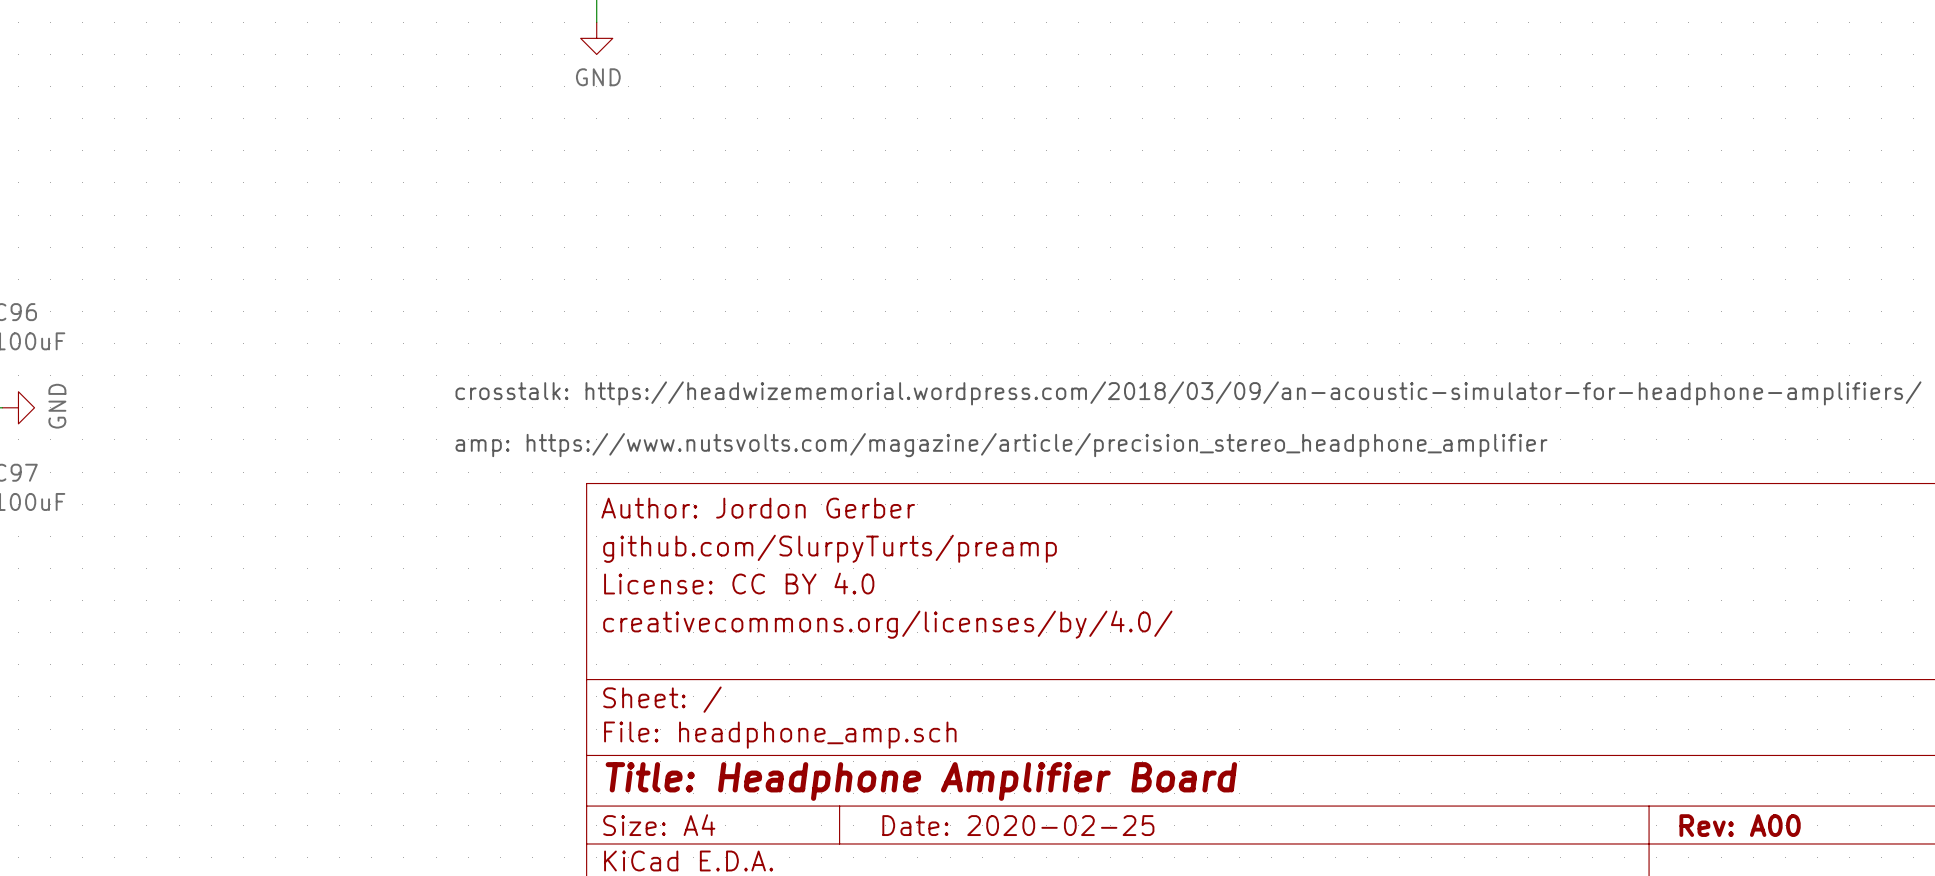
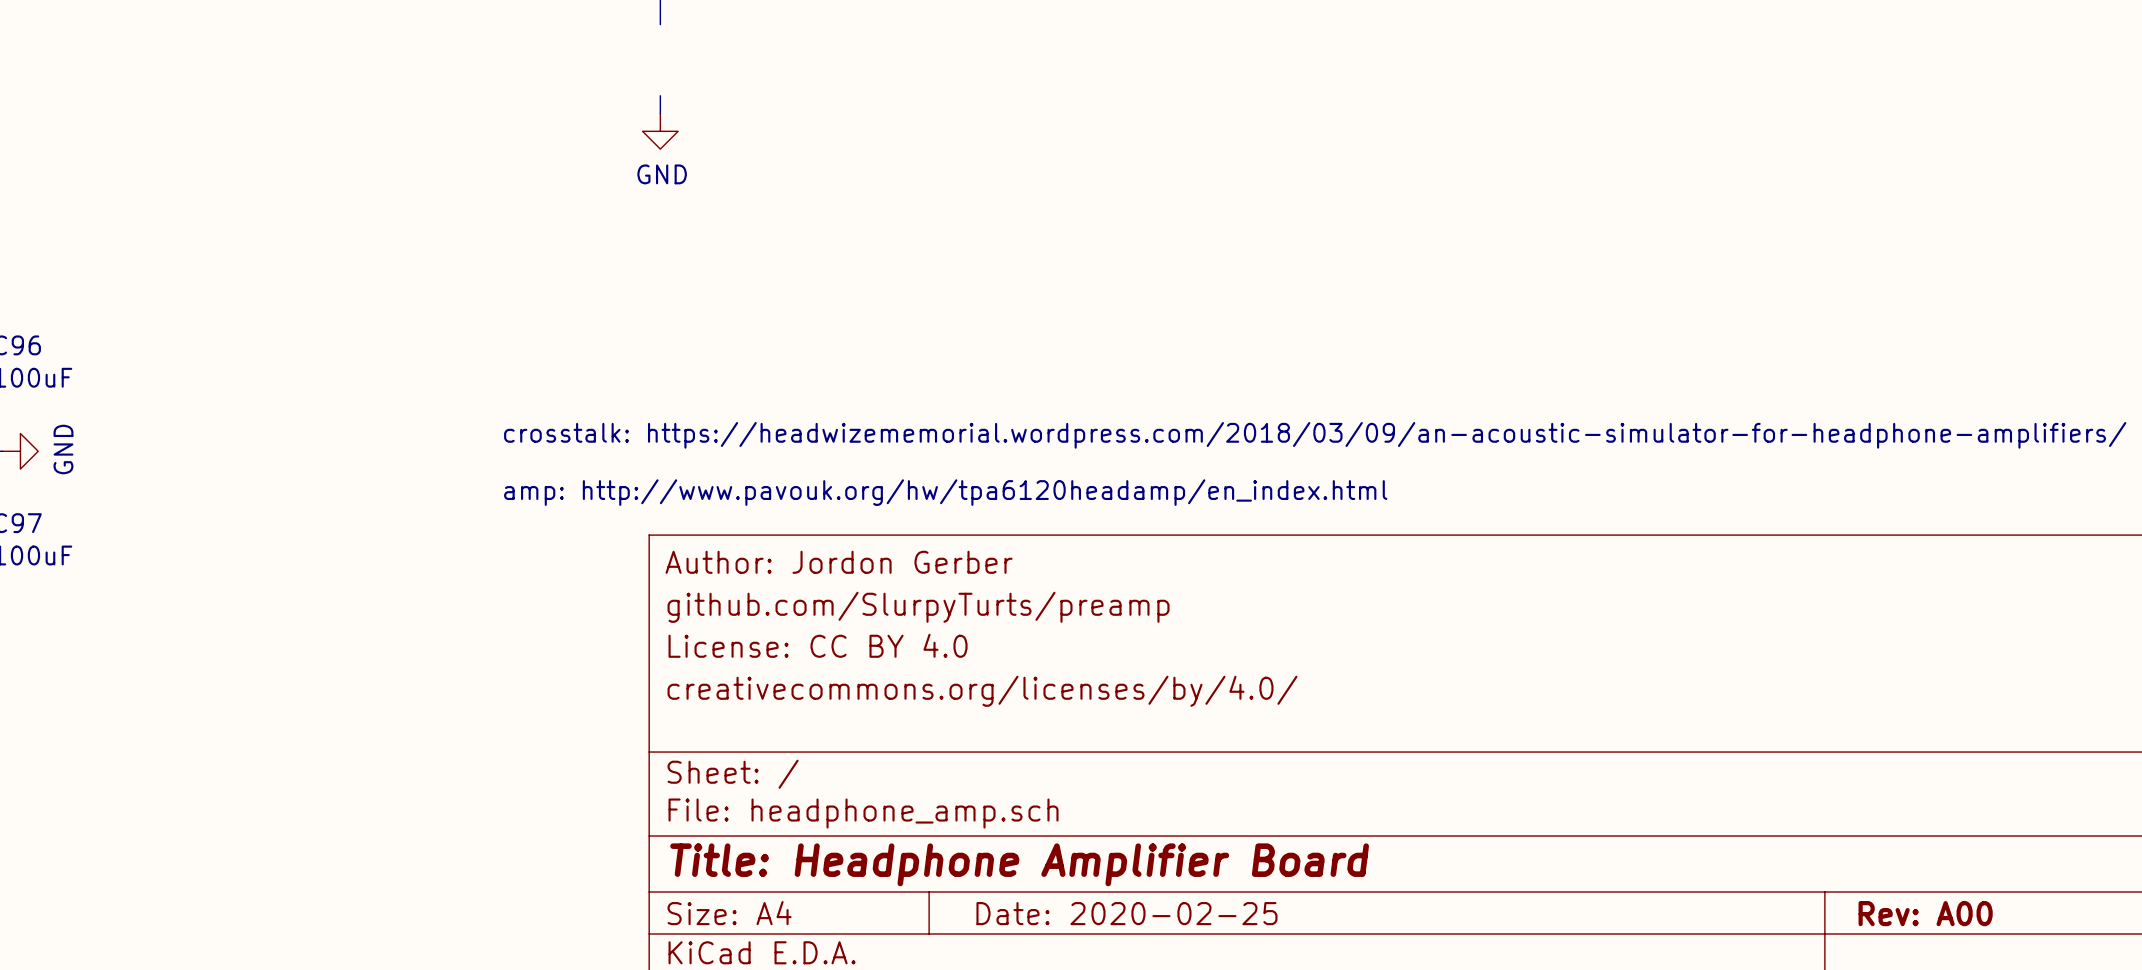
power symbol position: GND (596, 38) -> GND (660, 131)
wire: none -> (660, 95) (660, 113)
text: amp: https://www.nutsvolts.com/magazine/article/precision_stereo_headphone_amplifier (1001, 445) -> amp: http://www.pavouk.org/hw/tpa6120headamp/en_index.html (945, 492)

